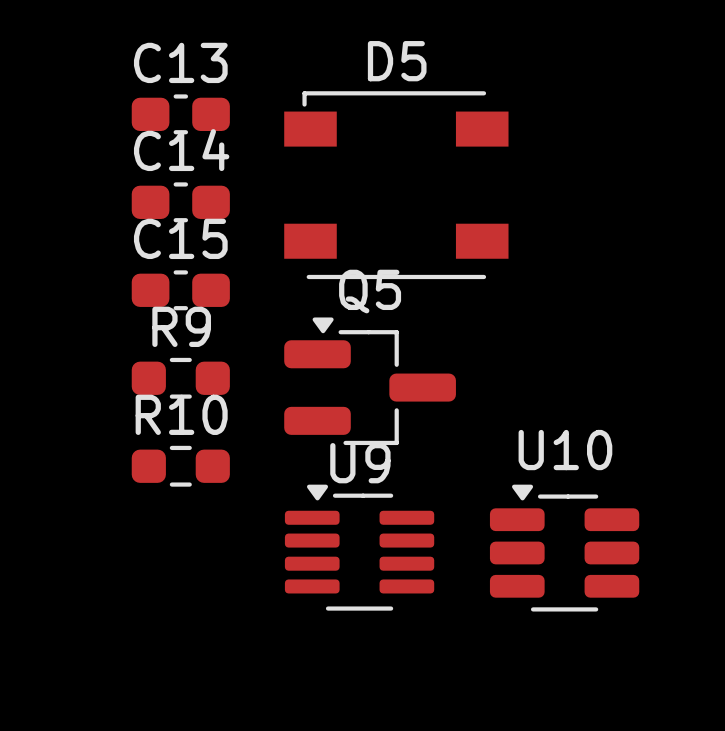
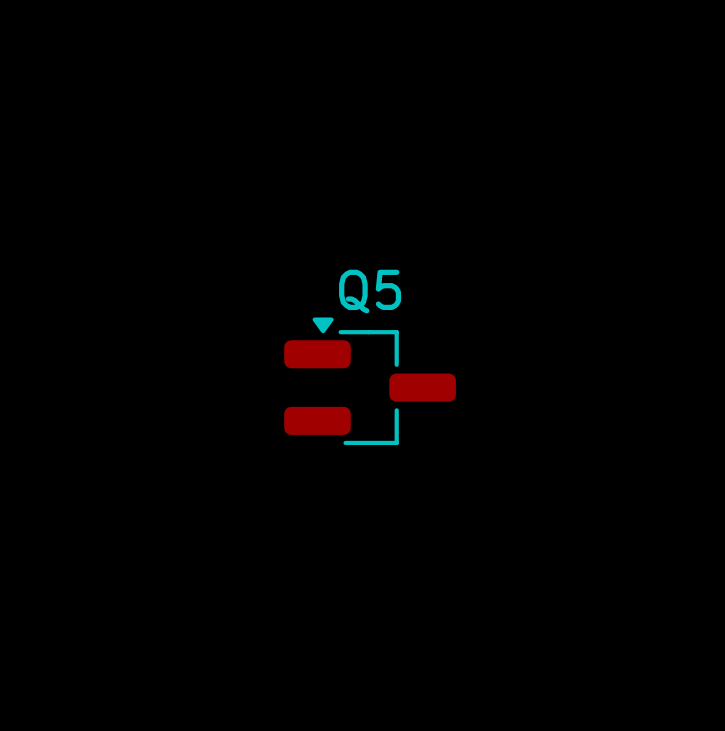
C13: (180, 114) -> none
D5: (396, 185) -> none
C14: (180, 202) -> none
C15: (180, 290) -> none
R9: (180, 378) -> none
R10: (180, 466) -> none
U9: (359, 547) -> none
U10: (564, 548) -> none

